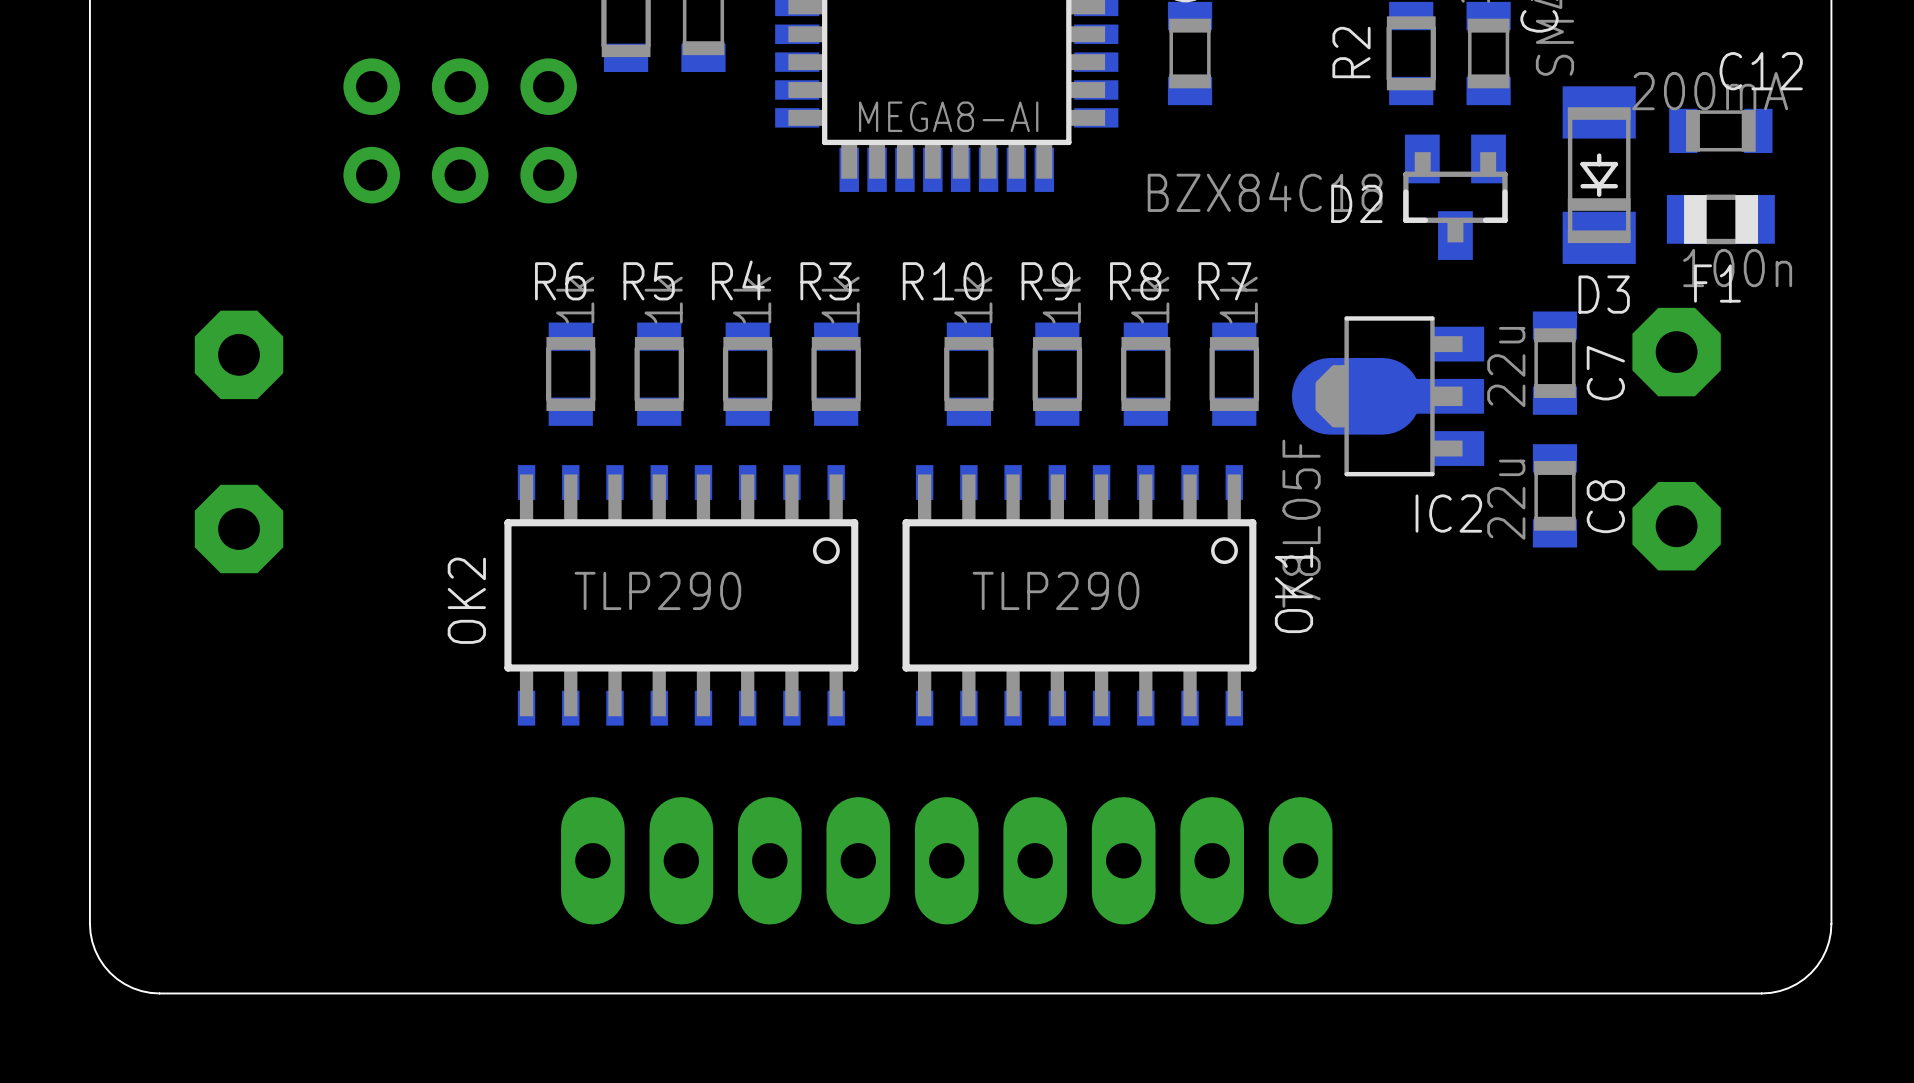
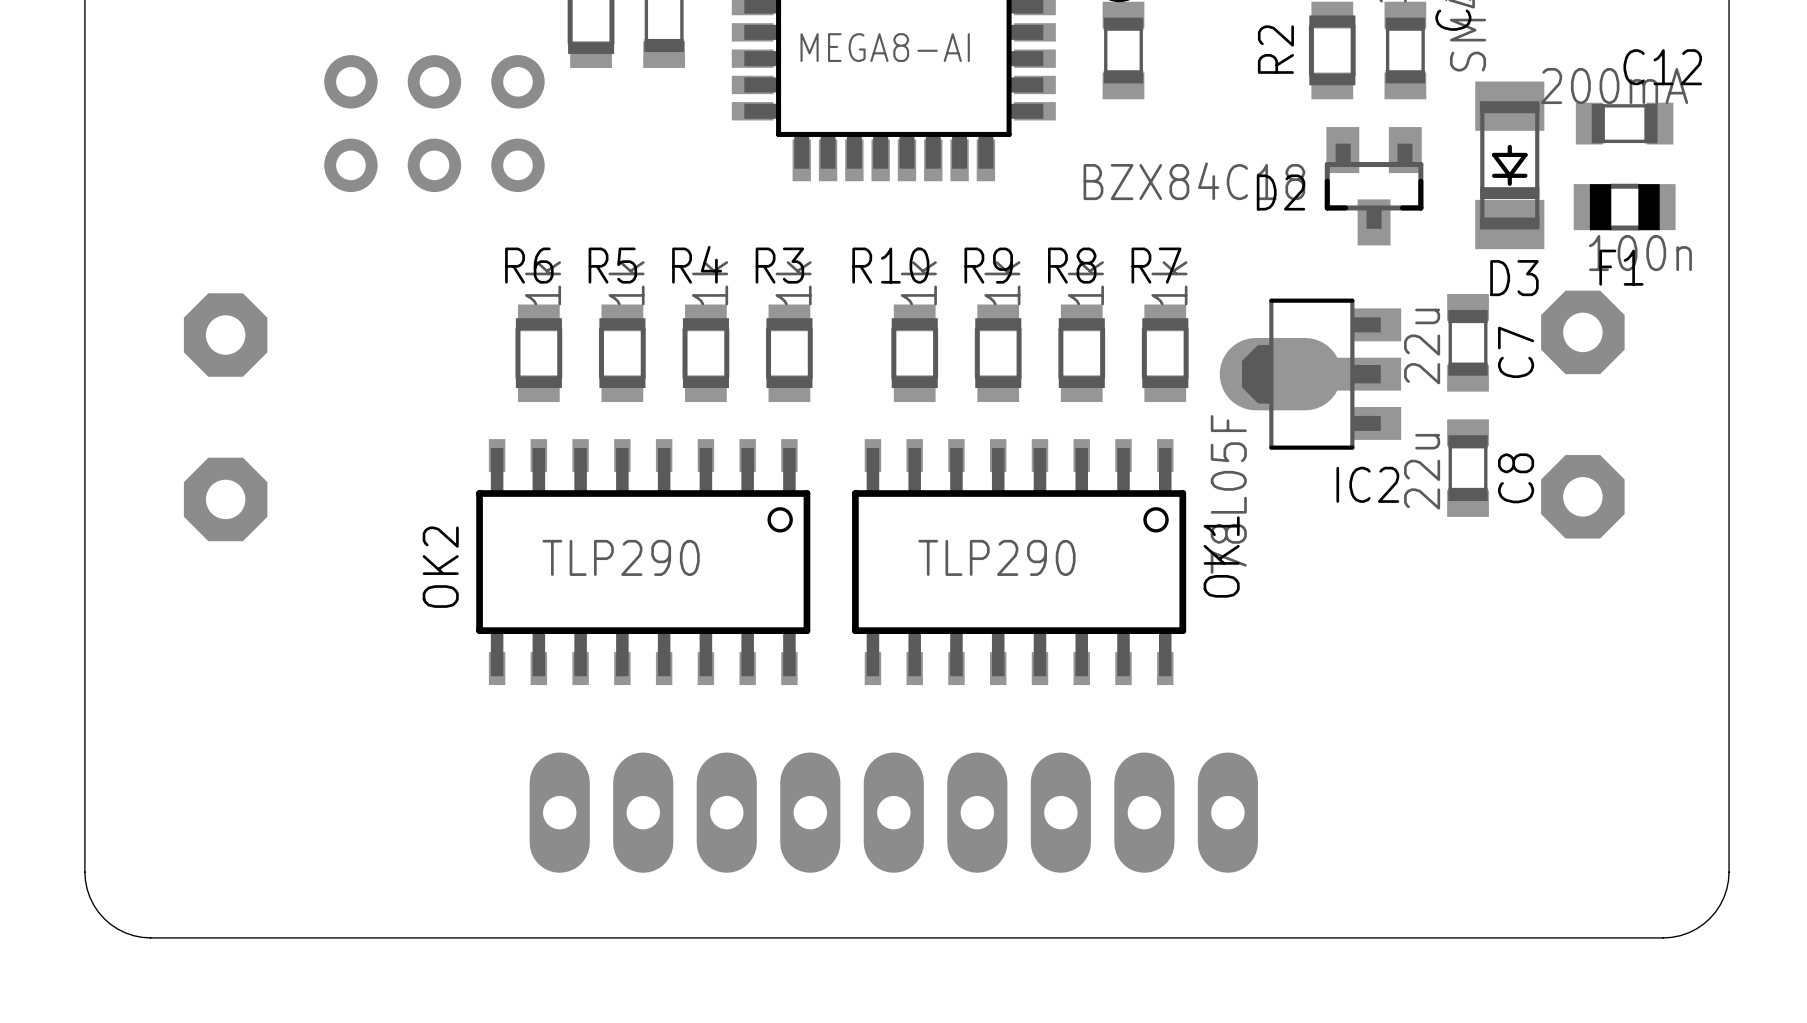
part value position: MEGA8-AI (948, 116) -> MEGA8-AI (885, 47)

